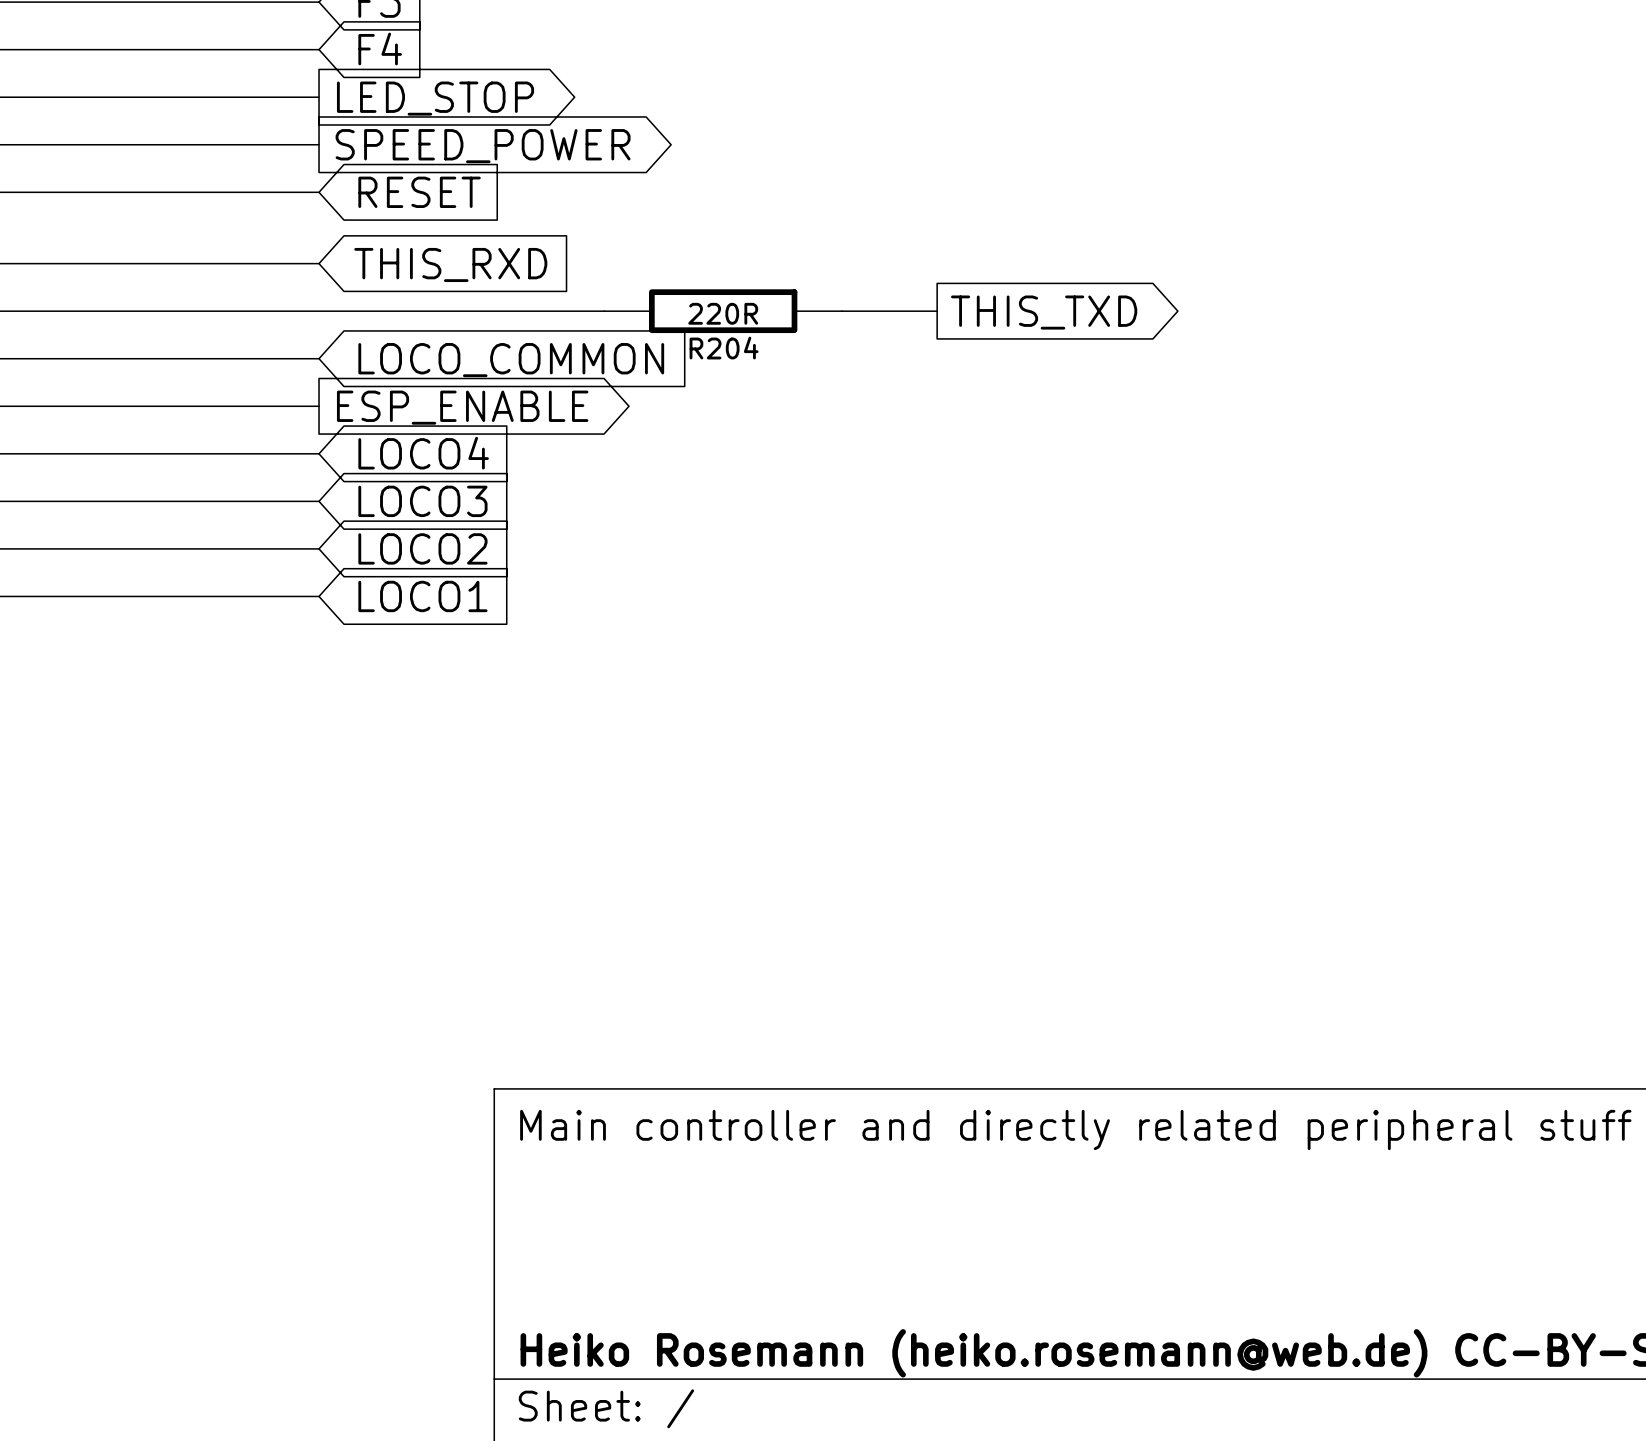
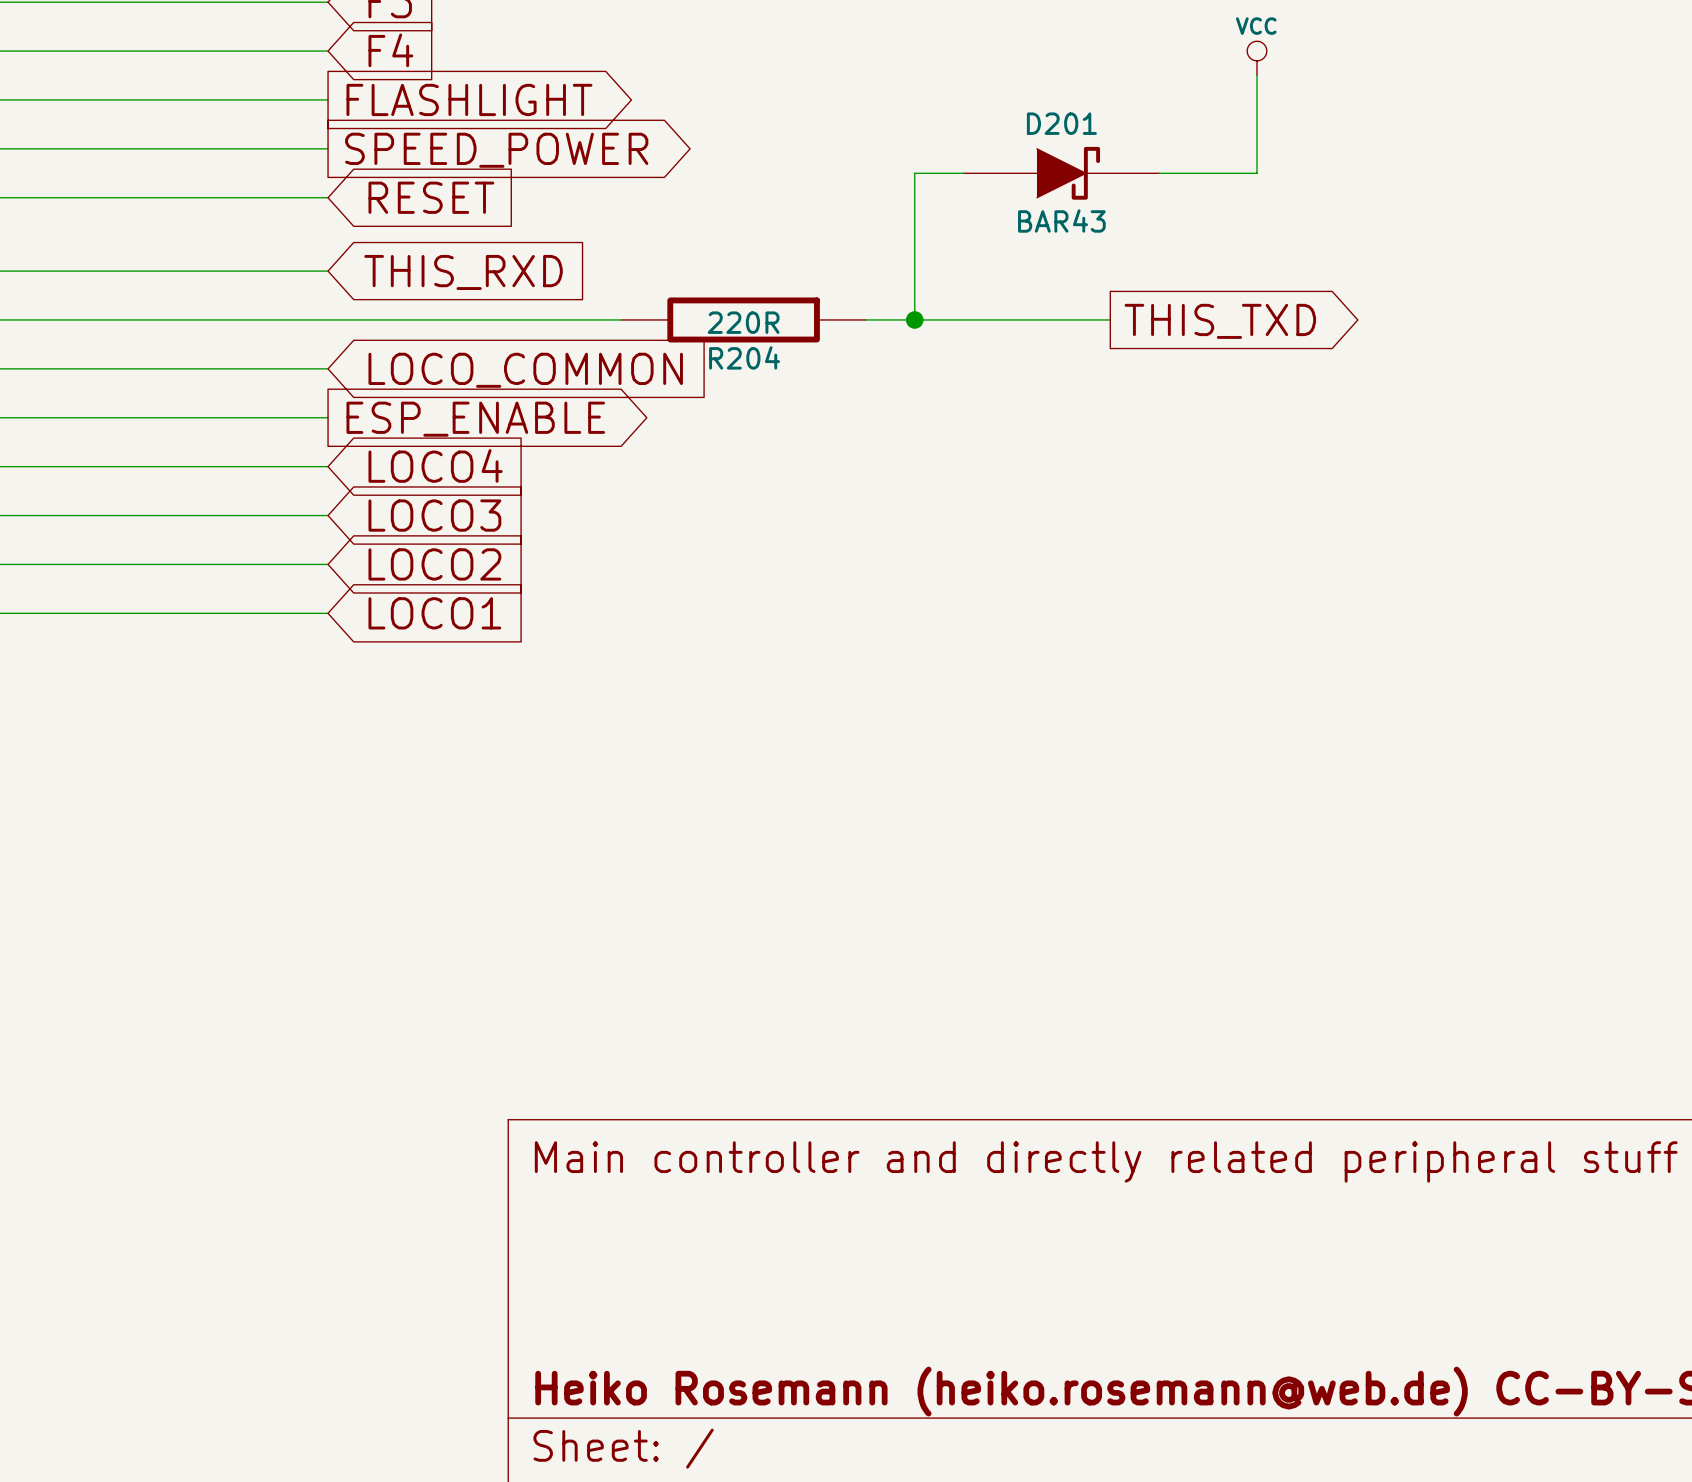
power symbol: none -> VCC (1256, 58)
wire: none -> (1256, 75) (1256, 173) (1159, 173)
global label: LED_STOP (435, 98) -> FLASHLIGHT (469, 99)
wire: none -> (963, 173) (914, 173) (914, 319)
D201: none -> BAR43 (1061, 173)
junction: none -> (914, 319)
wire: none -> (963, 319) (1110, 319)
global label position: THIS_TXD (1044, 312) -> THIS_TXD (1220, 321)

